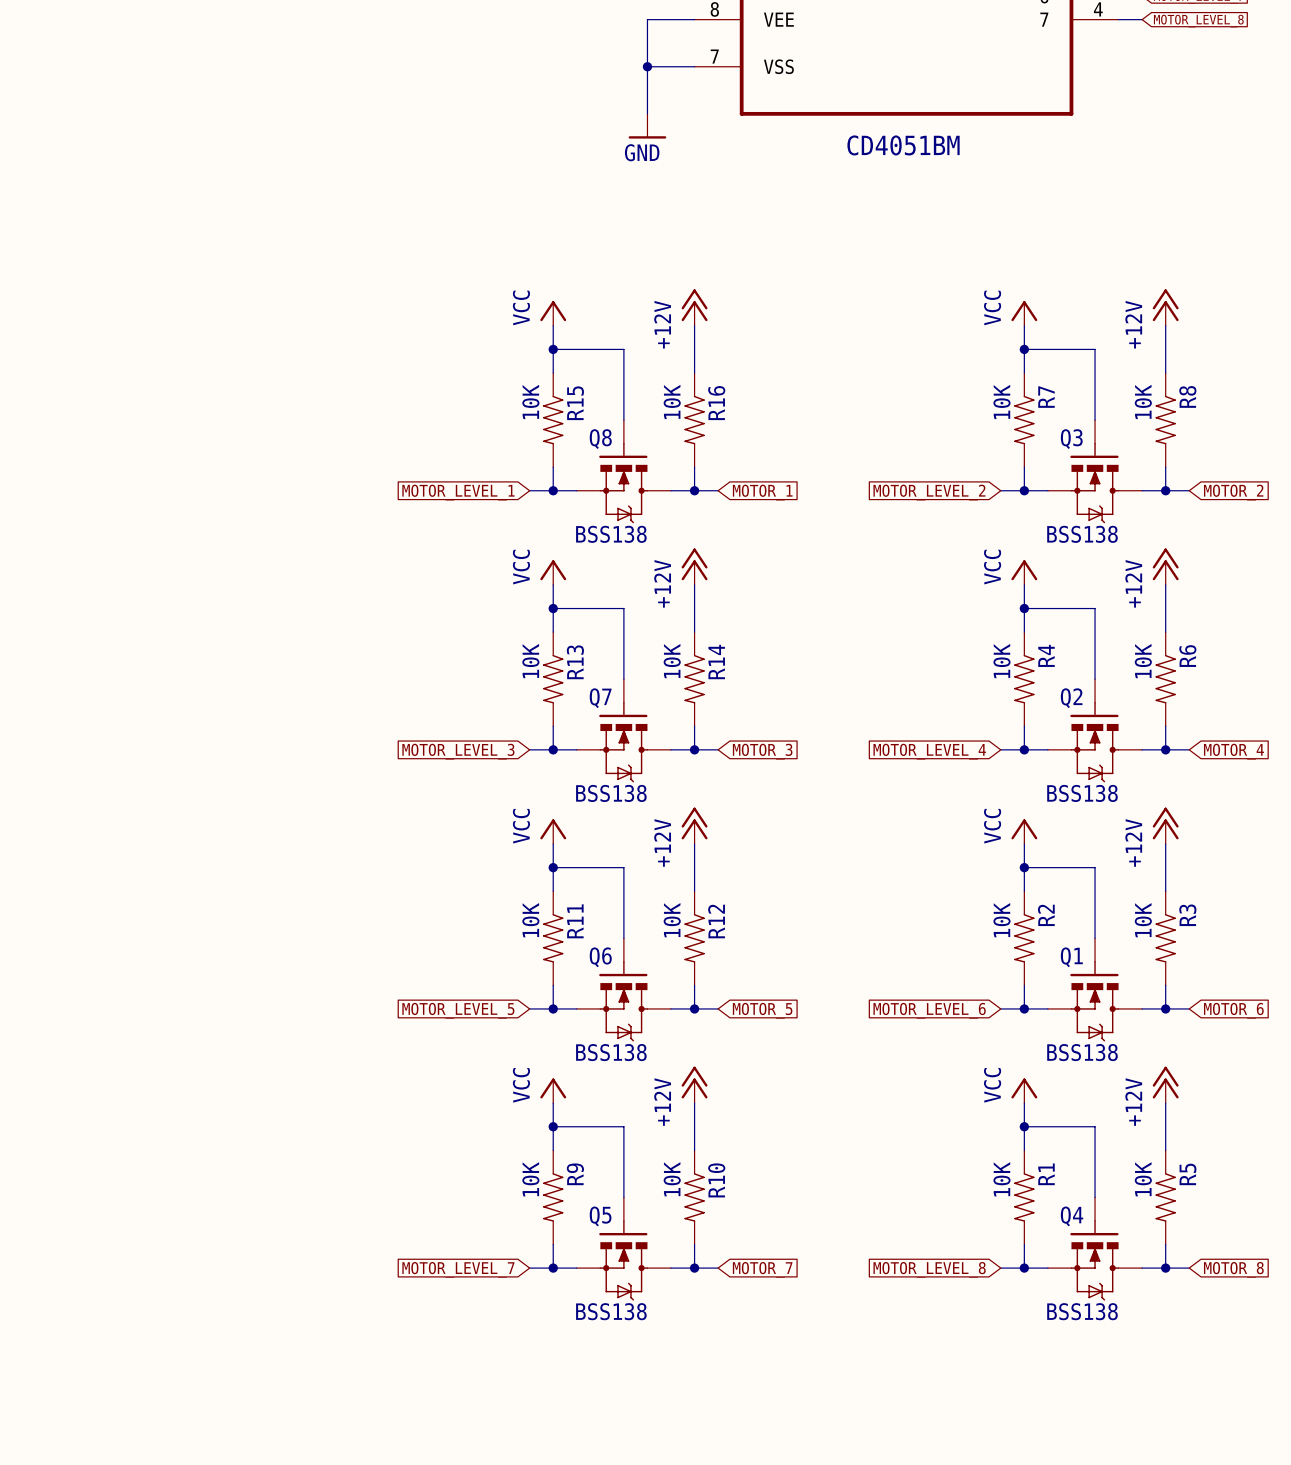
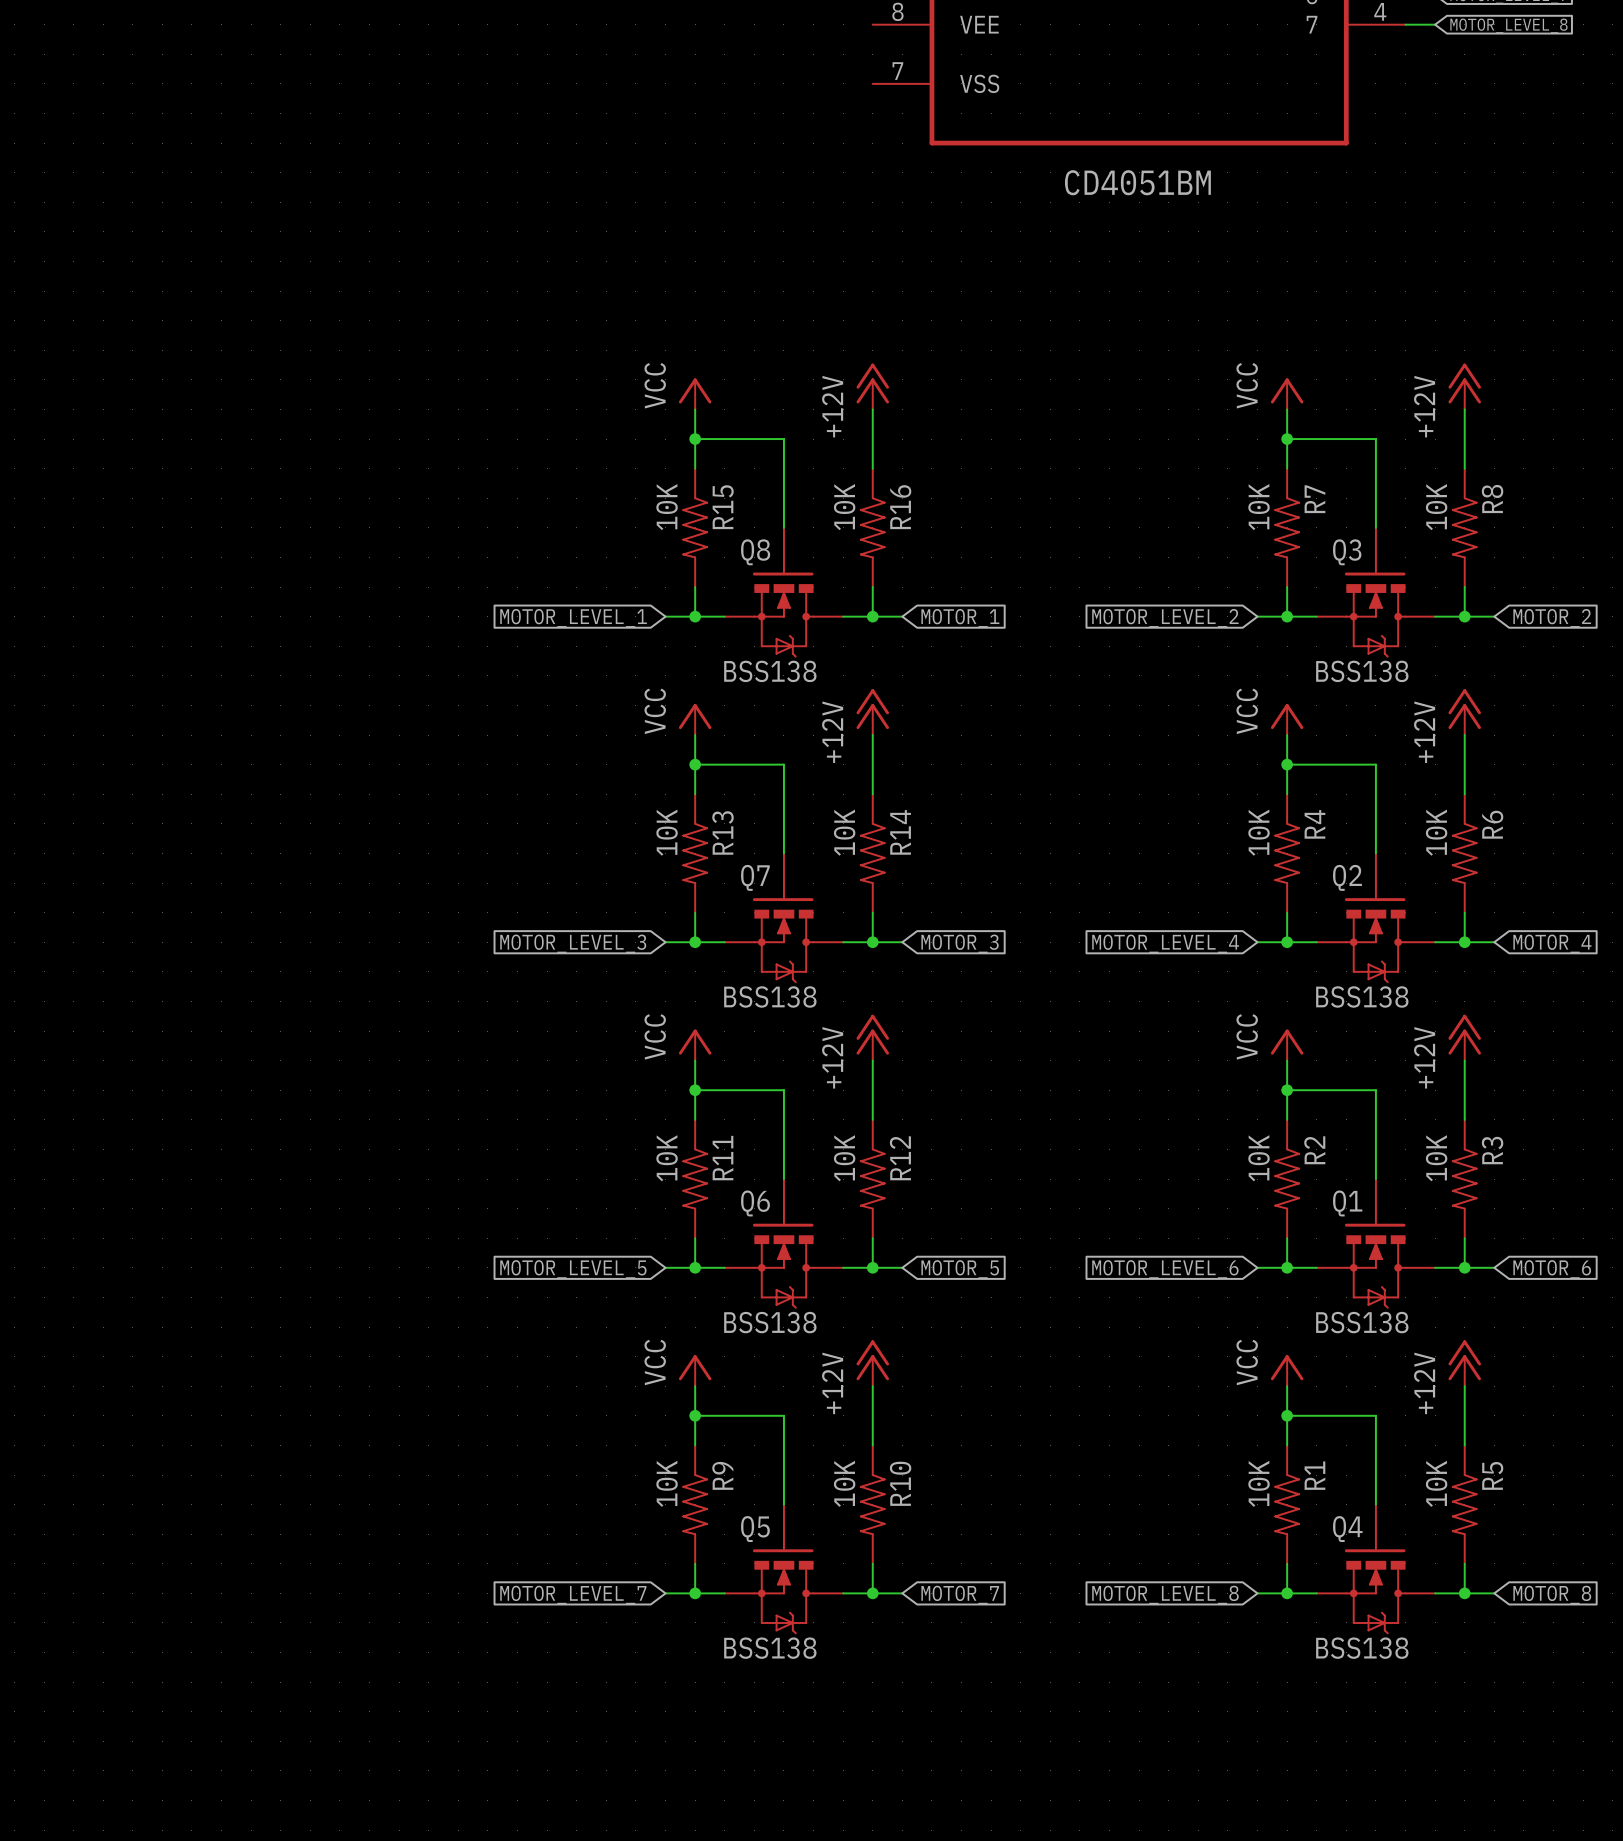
wire: (694, 19) (647, 19) (647, 113) -> none
wire: (647, 66) (694, 66) -> none
junction: (647, 66) -> none
power symbol: GND (647, 126) -> none

